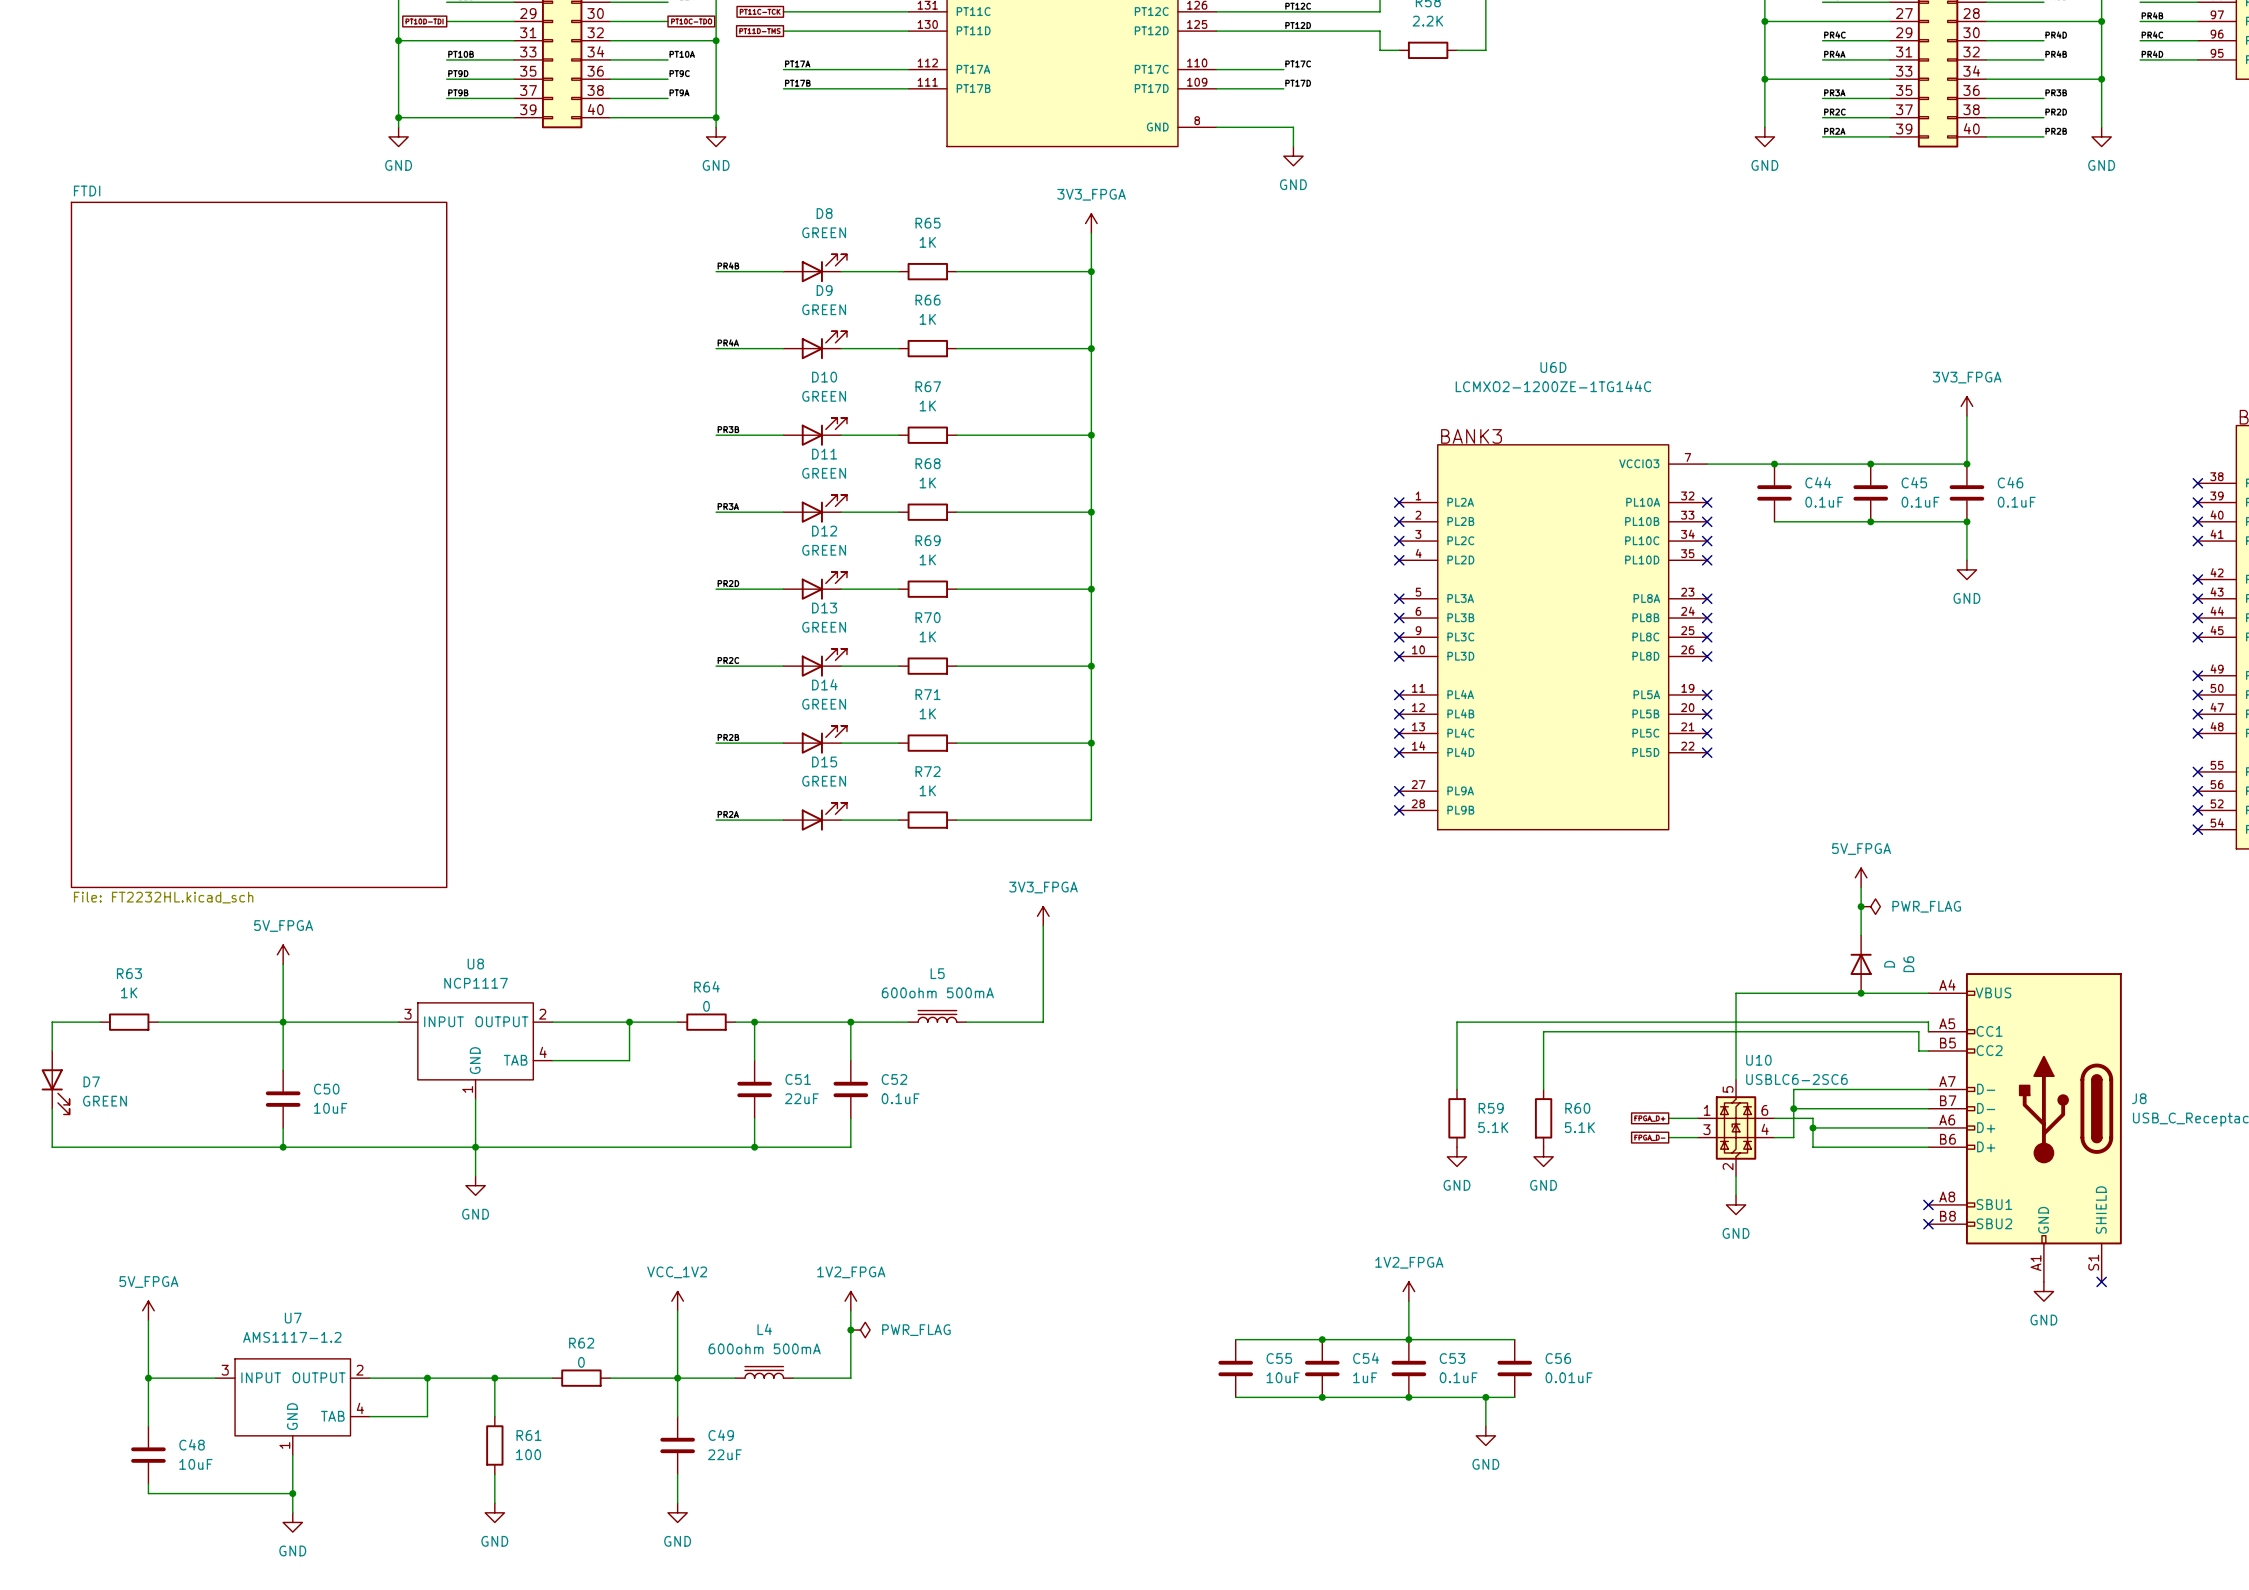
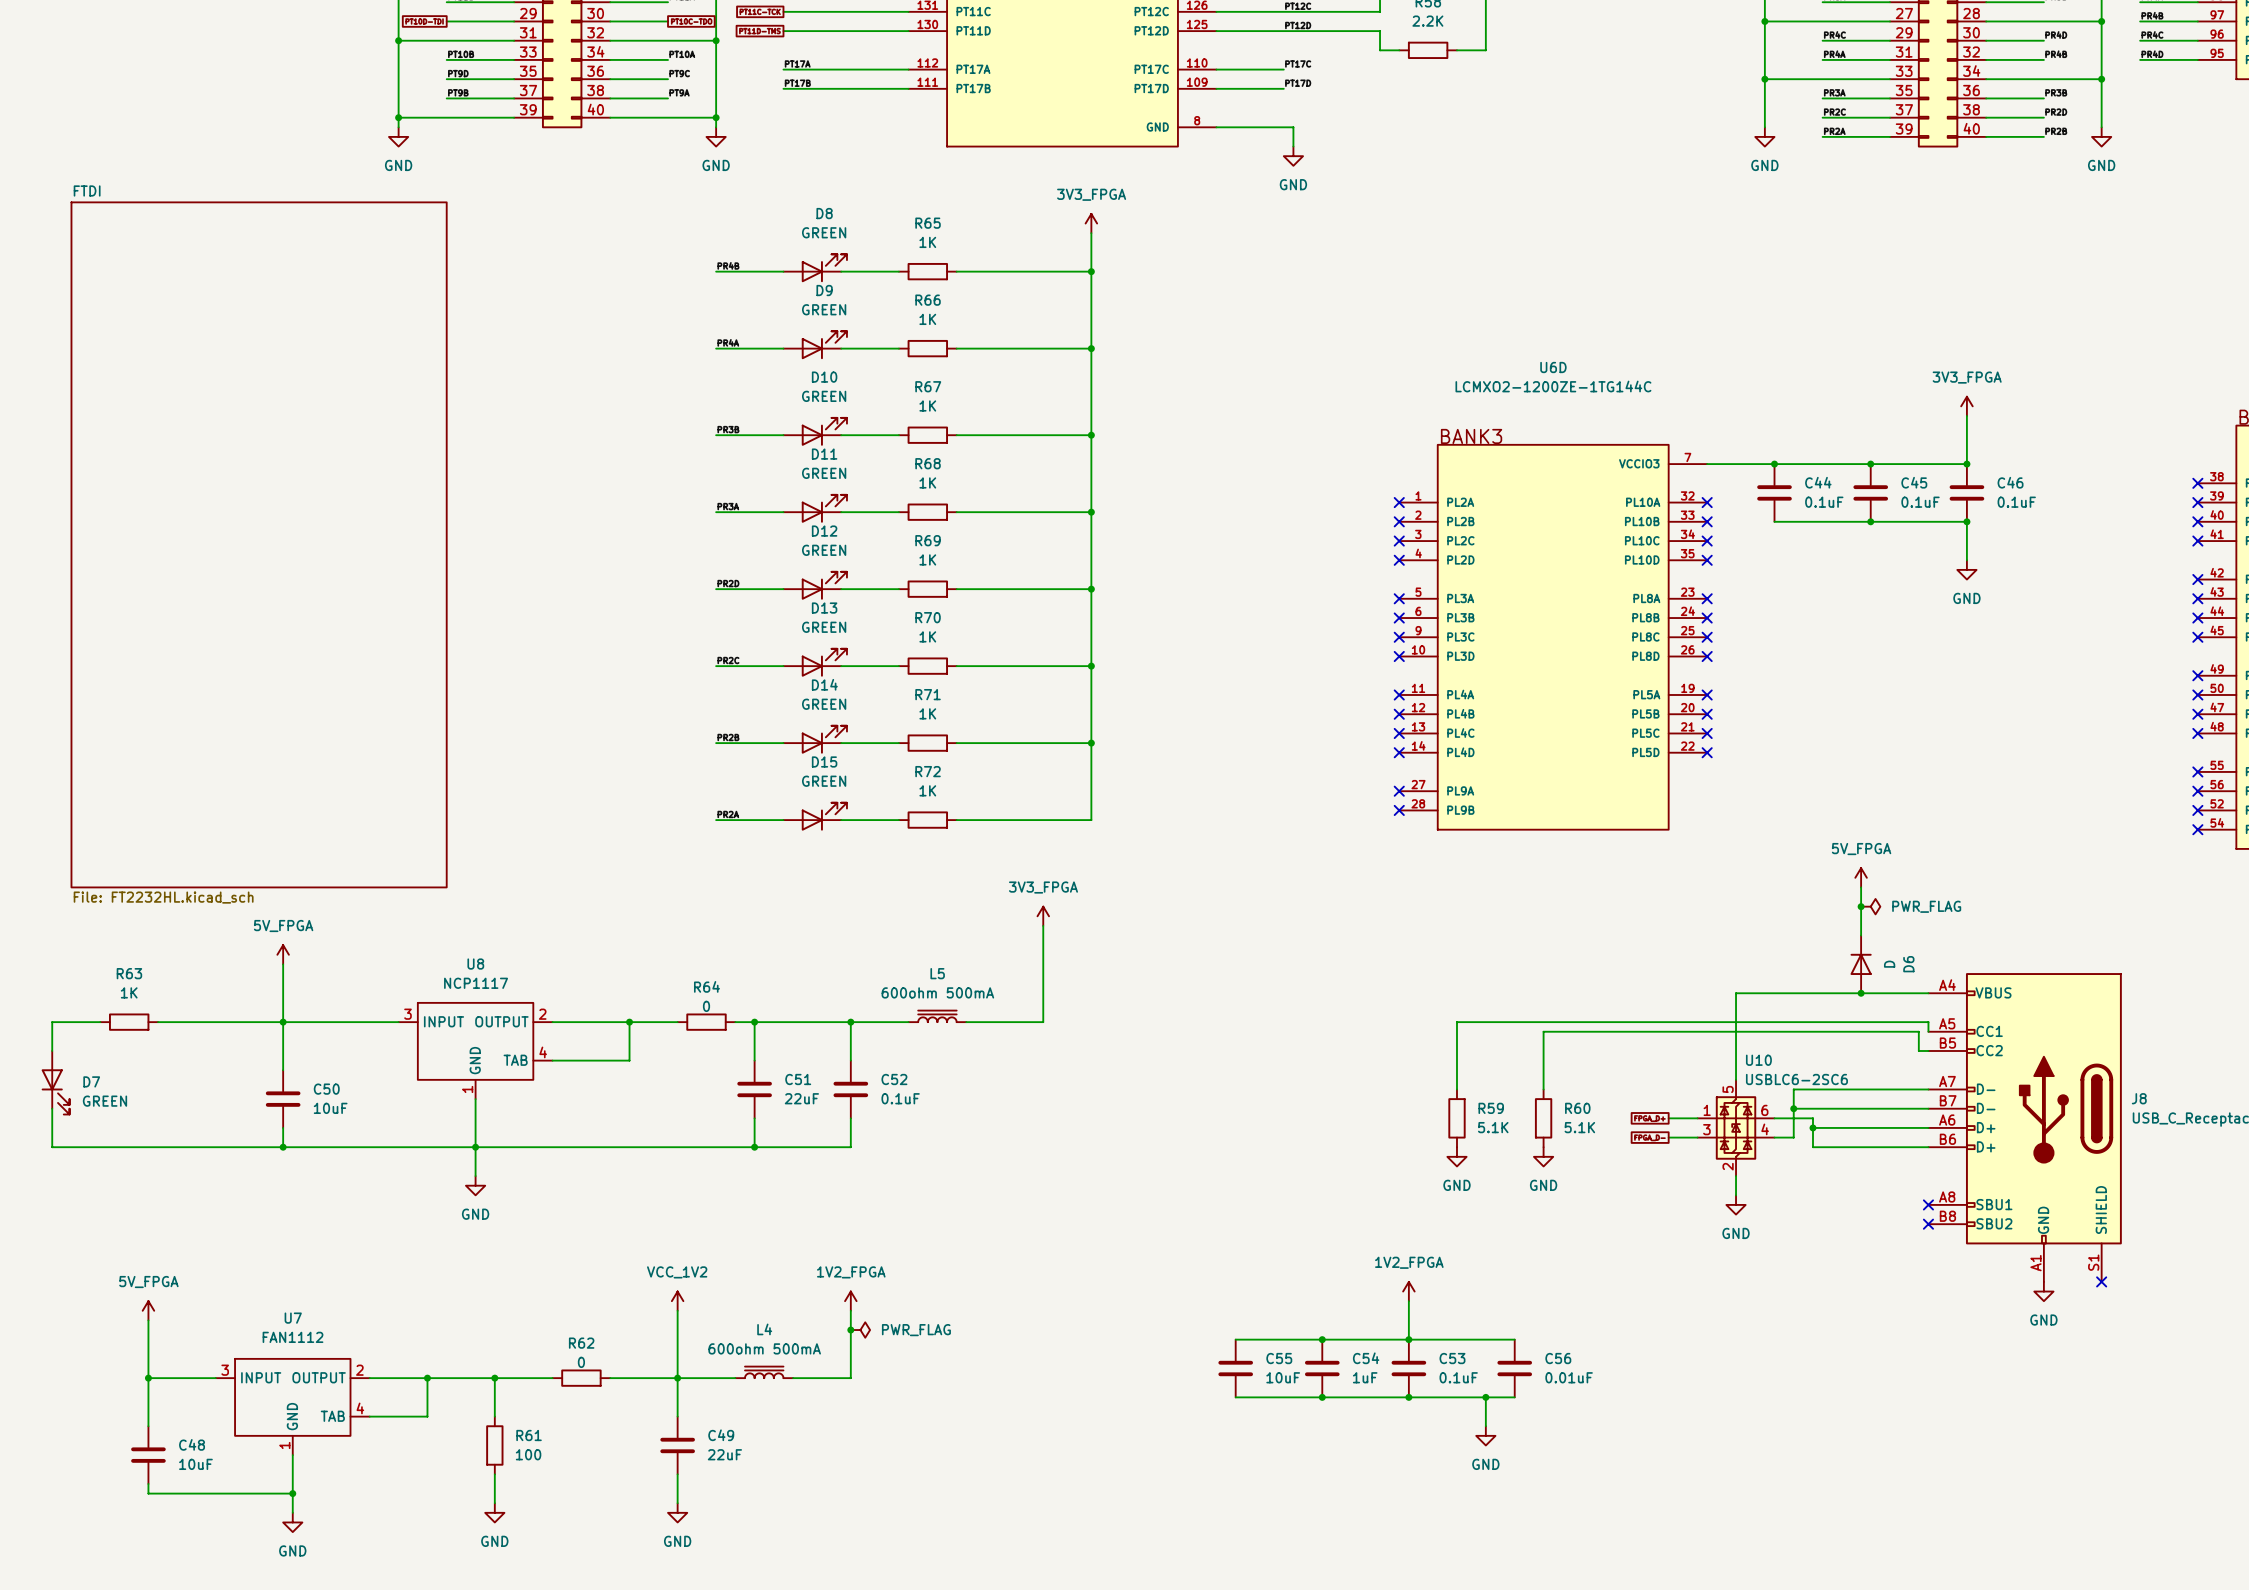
U7 value: AMS1117-1.2 (292, 1337) -> FAN1112 (293, 1337)

